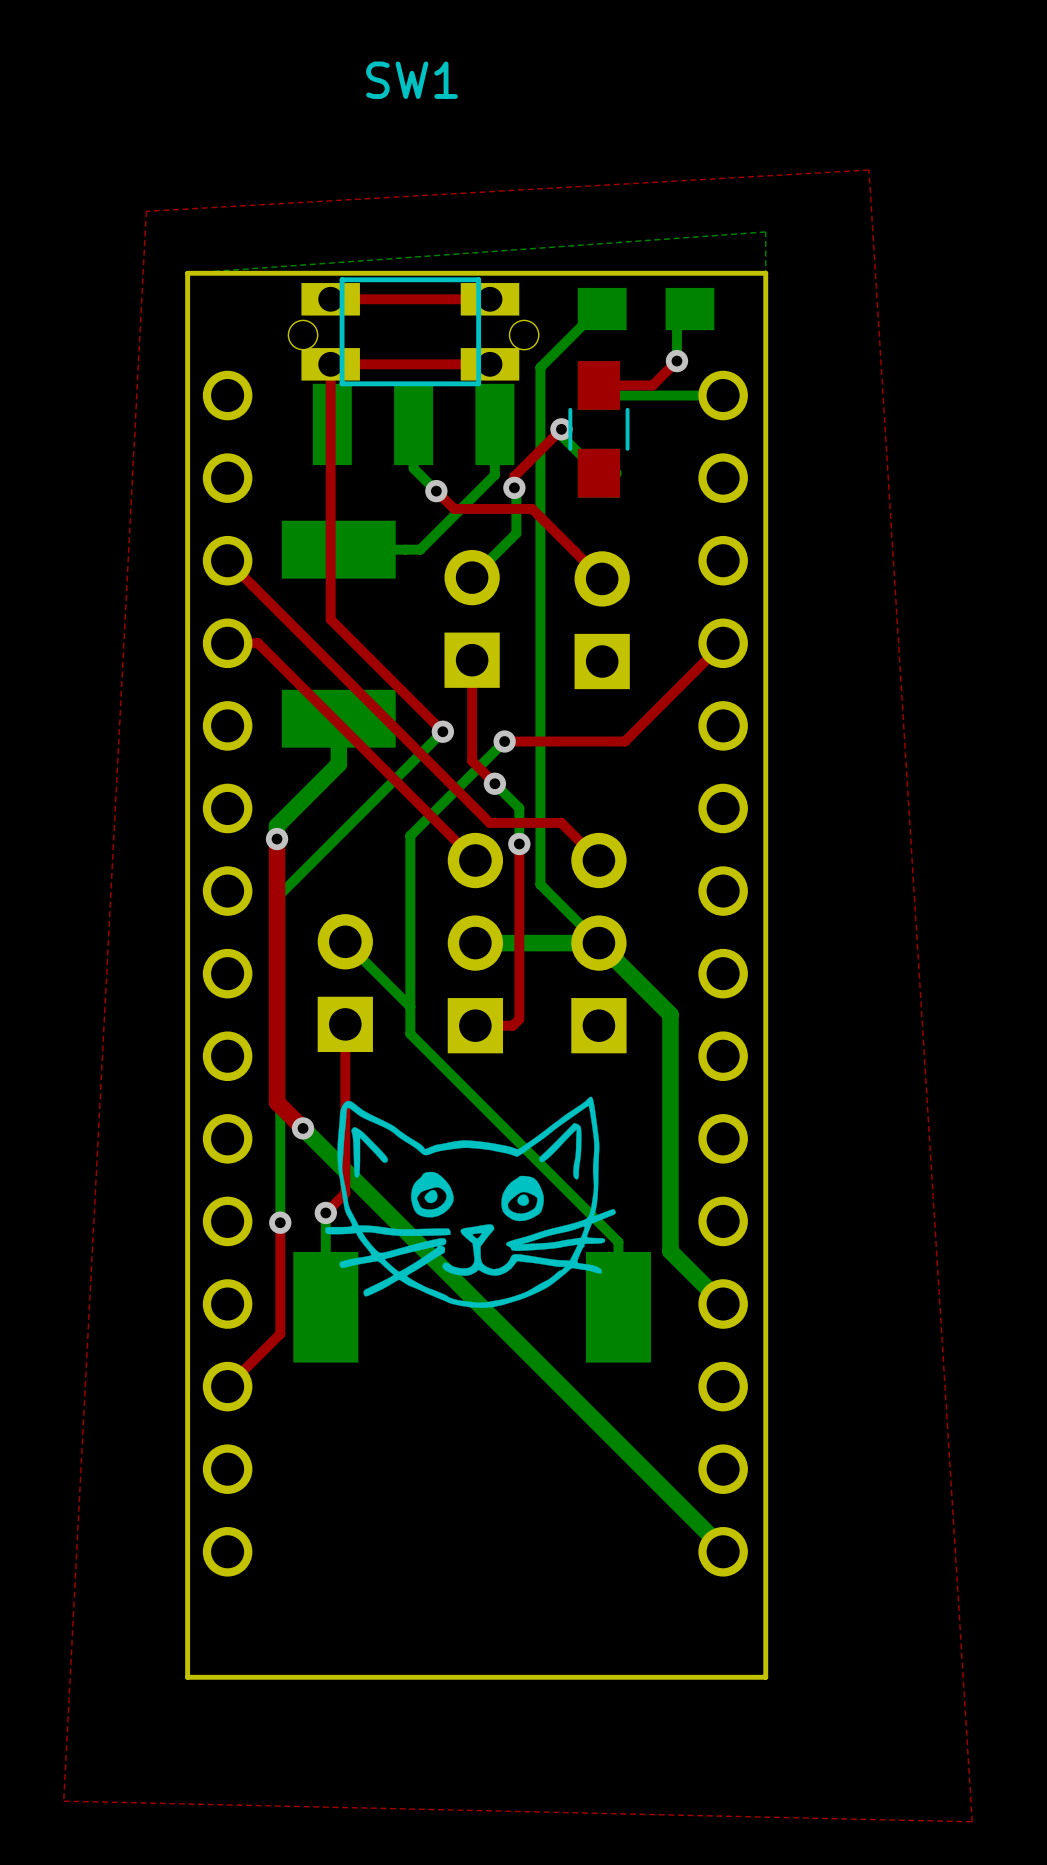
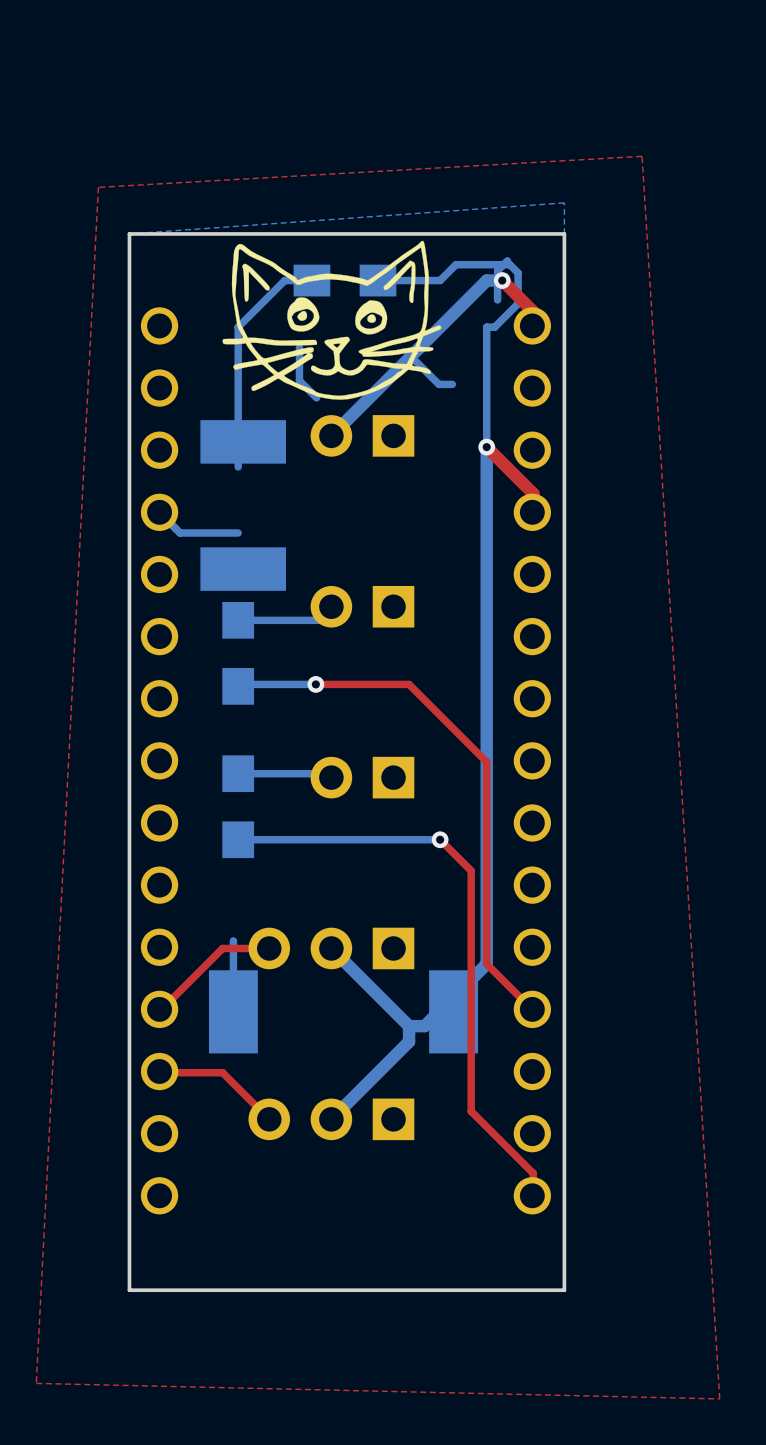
drawing: none -> [222, 240, 442, 400]
top track: (330, 299) (490, 299) -> none
bottom track: (602, 309) (598, 309) (540, 367) (540, 884) (598, 943) -> none
part: (646, 309) -> none
SW1: (410, 331) -> none
bottom track: none -> (311, 280) (284, 280) (238, 327) (238, 466)
part: none -> (344, 280)
bottom track: none -> (378, 280) (440, 280) (455, 264) (509, 264) (518, 272) (518, 303) (494, 327) (486, 327) (486, 964) (424, 1026) (409, 1026)
bottom track: none -> (502, 280) (486, 280) (331, 435)
top track: none -> (502, 280) (533, 311) (533, 327)
top track: (676, 361) (652, 385) (598, 385) -> none
via position: (676, 361) -> (502, 280)
top track: (490, 364) (330, 364) (330, 619) (442, 731) -> none
bottom track: (598, 385) (609, 395) (723, 395) -> none
part: (413, 392) -> none
bottom track: (494, 424) (494, 475) (420, 549) (338, 549) -> none
top track: (561, 429) (514, 476) (514, 487) -> none
via: (561, 429) -> none
part: (598, 429) -> none
bottom track: (514, 487) (516, 489) (516, 533) (472, 577) -> none
via: (514, 487) -> none
top track: (436, 491) (454, 508) (532, 508) (602, 578) -> none
via: (436, 491) -> none
part: none -> (362, 435)
top track: none -> (486, 447) (533, 493) (533, 513)
via: none -> (486, 447)
top track: (227, 560) (489, 822) (561, 822) (598, 860) -> none
part: (472, 618) -> none
part: (602, 620) -> none
top track: (227, 643) (258, 643) (475, 860) -> none
top track: (723, 643) (624, 741) (504, 741) -> none
bottom track: none -> (160, 513) (179, 533) (238, 533)
top track: (472, 660) (472, 761) (494, 783) -> none
bottom track: (338, 718) (338, 764) (277, 825) (277, 839) -> none
bottom track: (442, 731) (280, 894) (280, 1222) -> none
via: (442, 731) -> none
bottom track: (504, 741) (410, 835) (410, 1033) (618, 1242) (618, 1307) -> none
via: (504, 741) -> none
bottom track: none -> (331, 606) (317, 620) (238, 620)
part: none -> (362, 606)
bottom track: (494, 783) (519, 808) (519, 844) -> none
via: (494, 783) -> none
part: none -> (238, 653)
top track: (277, 839) (277, 1102) (303, 1128) -> none
via: (277, 839) -> none
top track: (519, 844) (519, 1019) (512, 1025) (475, 1025) -> none
via: (519, 844) -> none
bottom track: none -> (315, 684) (240, 684) (238, 686)
top track: none -> (315, 684) (409, 684) (486, 762) (486, 964) (533, 1010)
via: none -> (315, 684)
bottom track: (345, 941) (410, 1006) -> none
bottom track: (475, 943) (598, 943) -> none
part: (475, 943) -> none
bottom track: (598, 943) (670, 1014) (670, 1251) (723, 1304) -> none
part: (598, 943) -> none
part: (345, 983) -> none
bottom track: none -> (238, 773) (327, 773) (331, 777)
part: none -> (362, 777)
top track: (345, 1024) (345, 1193) (325, 1212) -> none
part: none -> (238, 806)
bottom track: none -> (238, 839) (440, 839)
top track: none -> (440, 839) (471, 870) (471, 1111) (533, 1173) (533, 1197)
via: none -> (440, 839)
drawing: [325, 1096, 616, 1309] -> none
bottom track: (303, 1128) (723, 1548) (723, 1551) -> none
via: (303, 1128) -> none
via: (325, 1212) -> none
top track: (280, 1222) (280, 1333) (227, 1386) -> none
via: (280, 1222) -> none
top track: none -> (269, 948) (222, 948) (160, 1010)
bottom track: none -> (331, 948) (409, 1026)
part: none -> (331, 948)
bottom track: none -> (409, 1026) (409, 1041) (331, 1119)
top track: none -> (160, 1072) (222, 1072) (269, 1119)
part: none -> (331, 1119)

